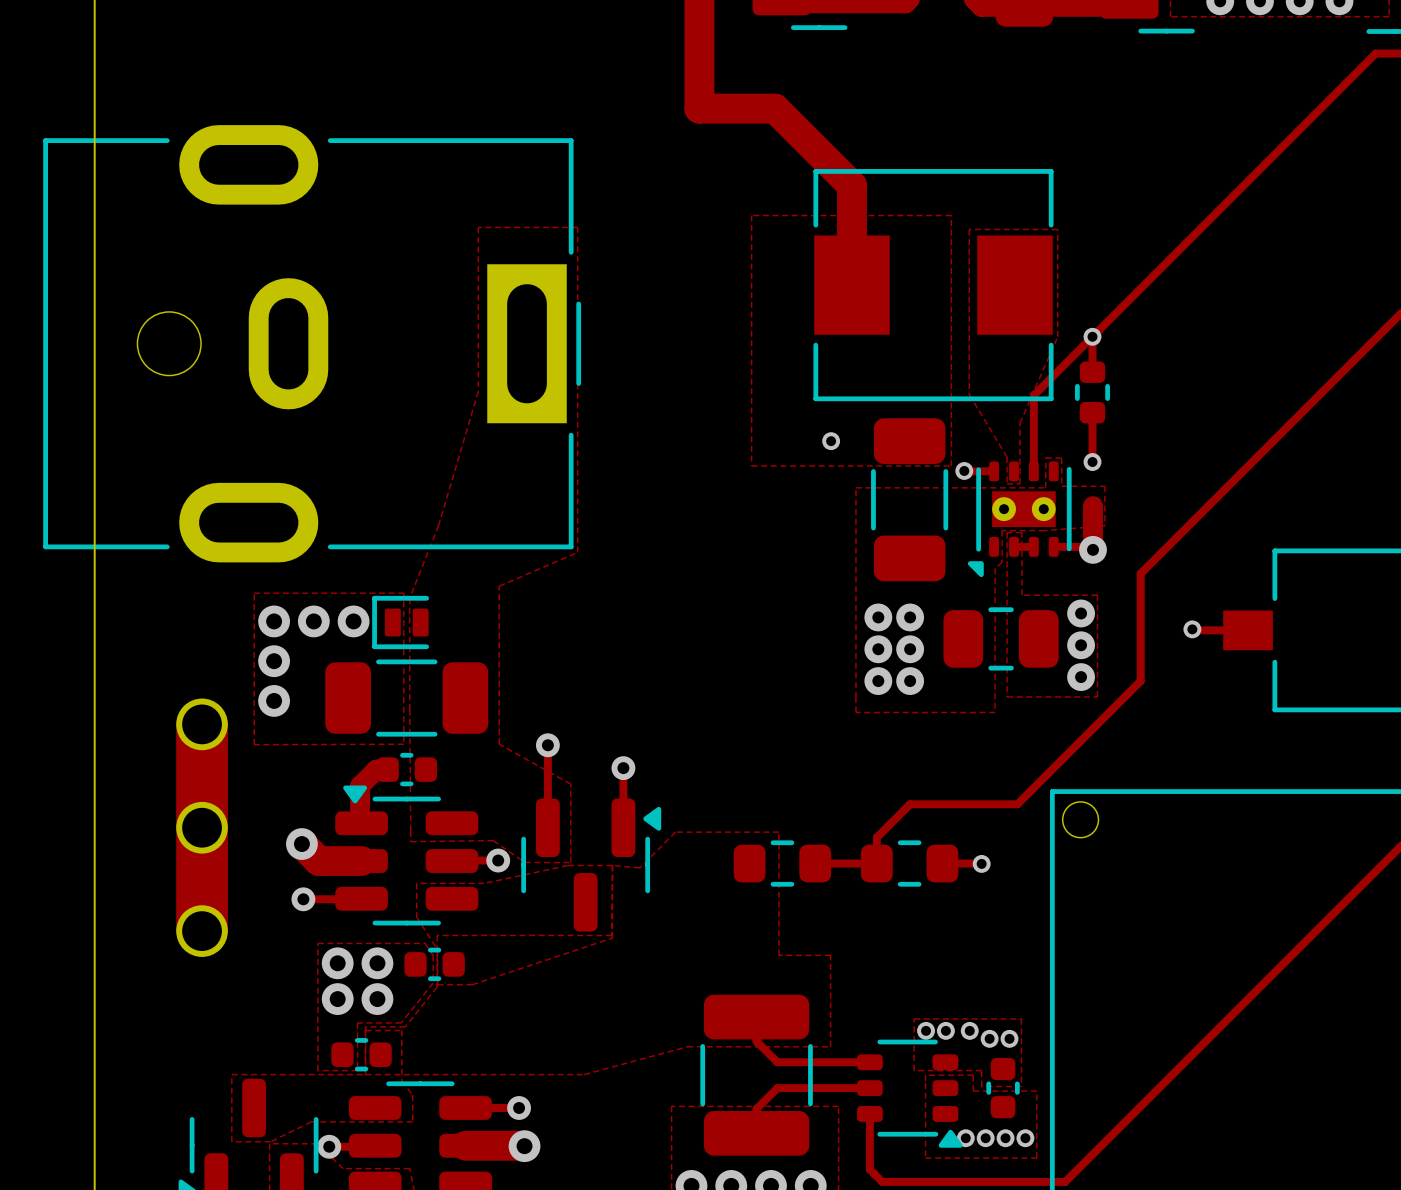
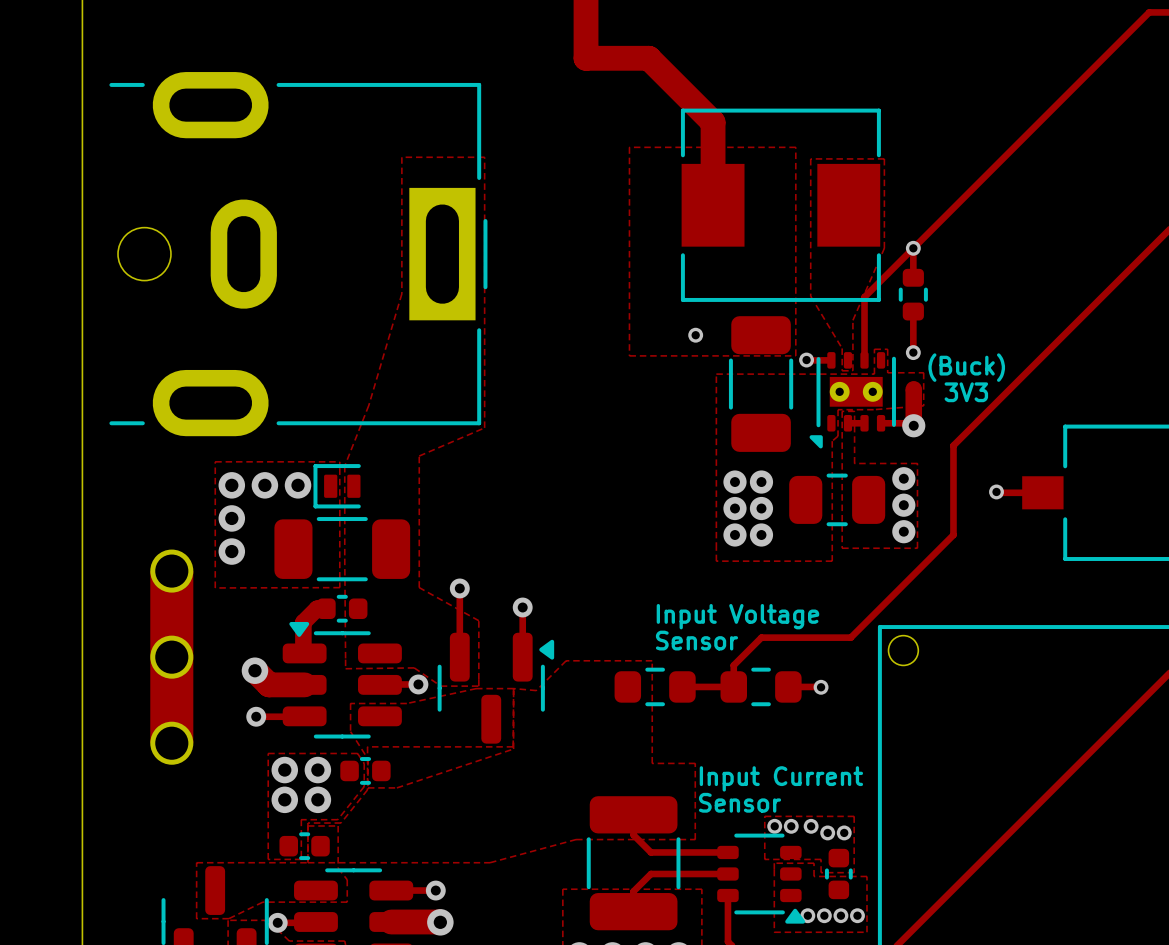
part: (312, 343) -> none
part: none -> (298, 254)
text: none -> (Buck) (966, 367)
text: none -> 3V3 (966, 392)
text: none -> Input Voltage (737, 616)
text: none -> Sensor (696, 640)
text: none -> Input Current (781, 778)
text: none -> Sensor (740, 802)

